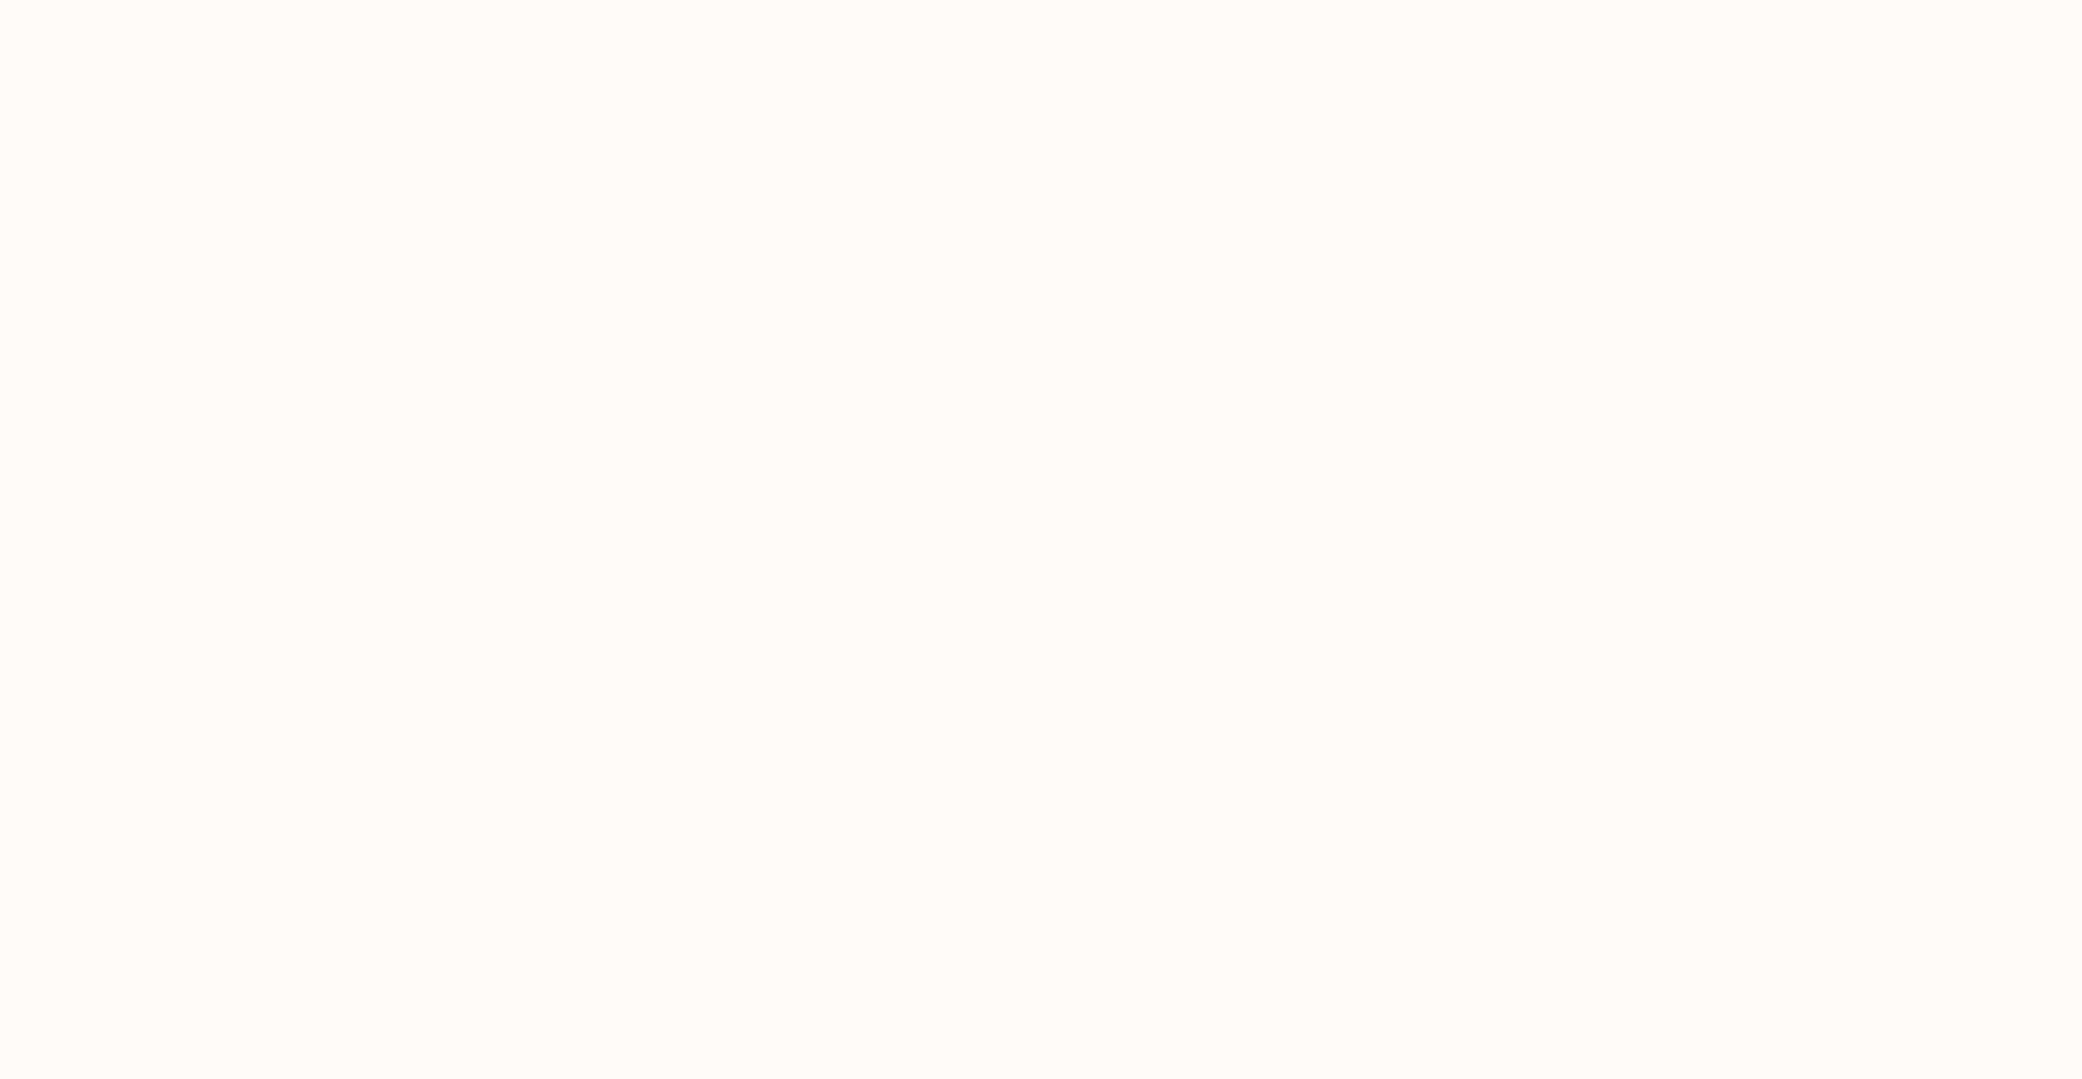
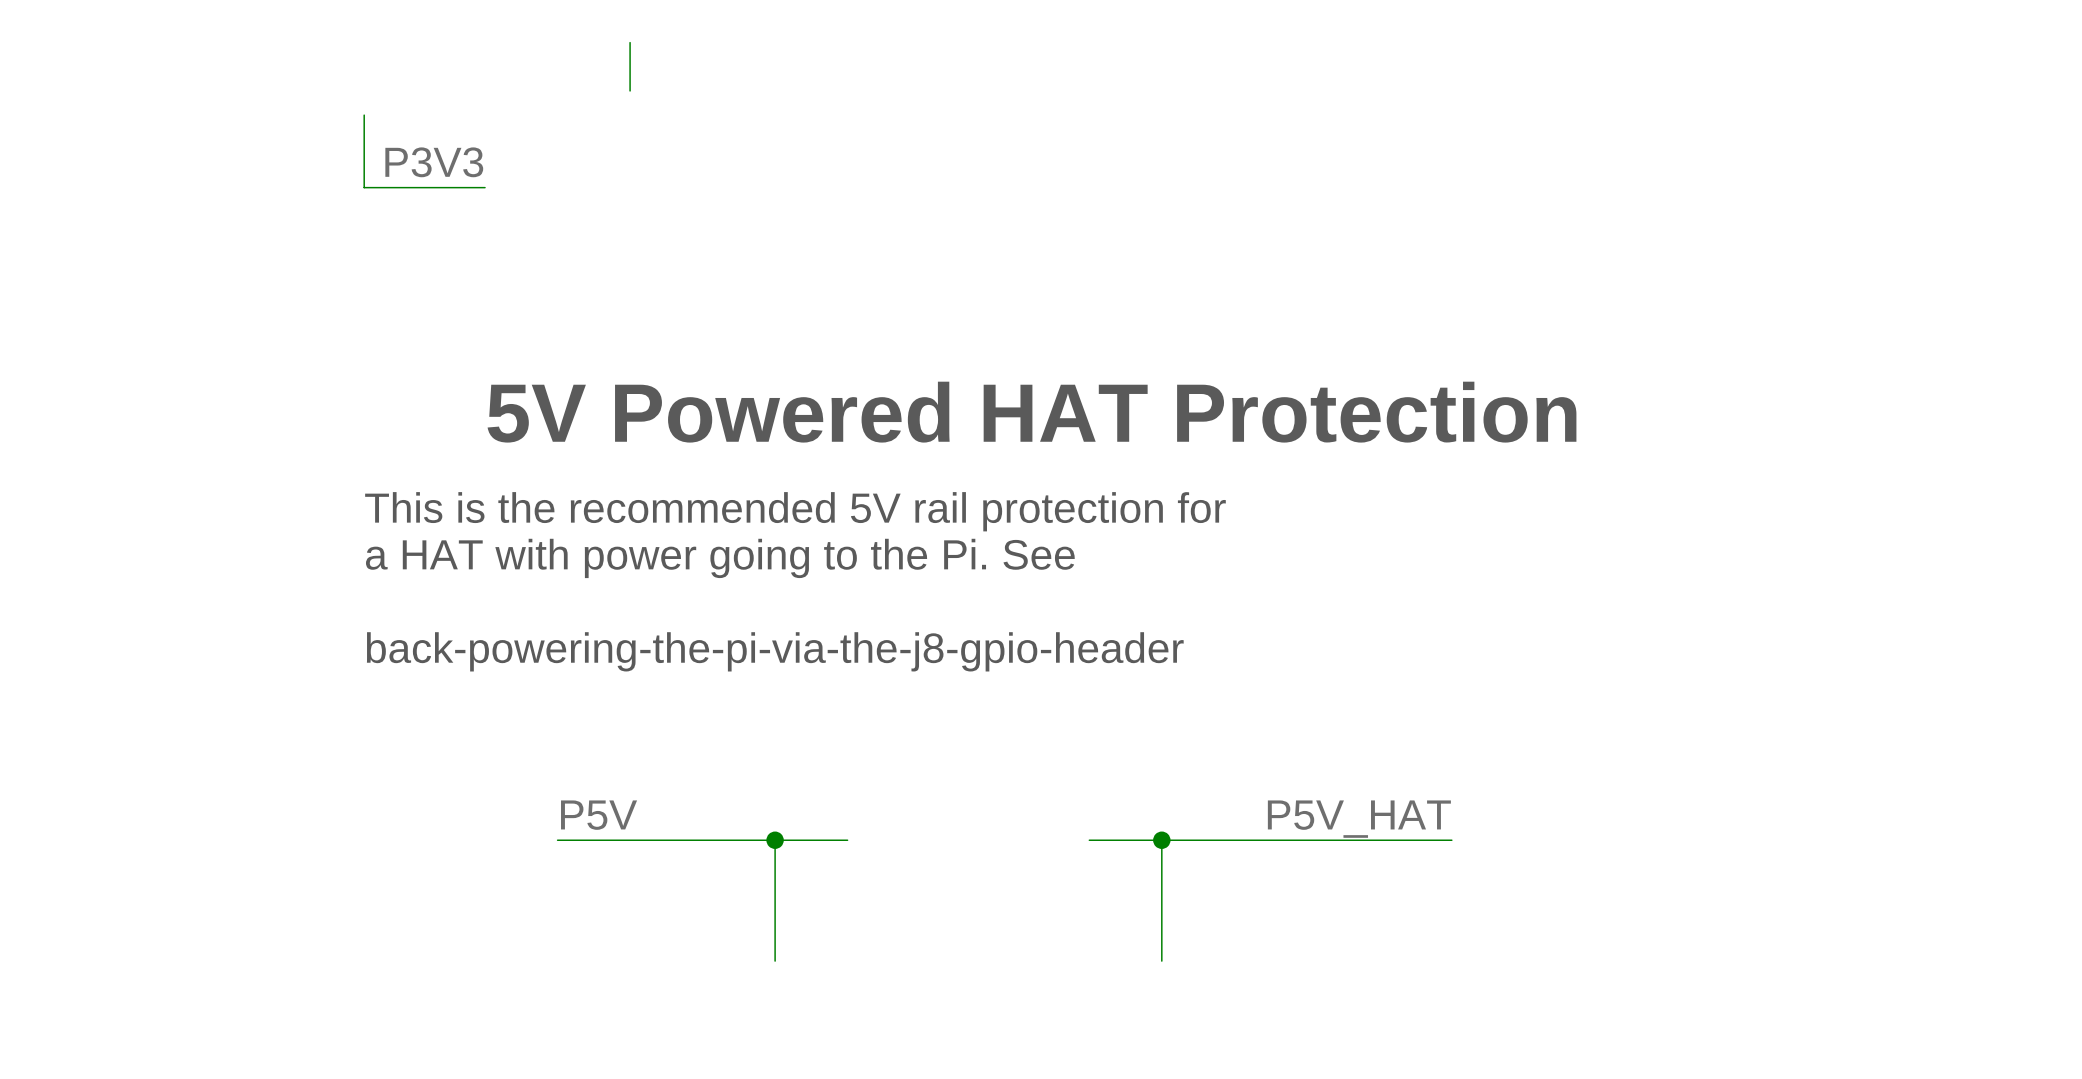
wire: none -> (630, 42) (630, 90)
wire: none -> (364, 115) (364, 187) (485, 187)
label: none -> P3V3 (434, 162)
text: none -> 5V Powered HAT Protection (1032, 412)
text: none -> This is the recommended 5V rail protection for (795, 511)
text: none -> a HAT with power going to the Pi. See (720, 558)
text: none -> back-powering-the-pi-via-the-j8-gpio-header (775, 651)
label: none -> P5V (599, 815)
label: none -> P5V_HAT (1359, 819)
wire: none -> (557, 840) (847, 840)
wire: none -> (775, 840) (775, 961)
junction: none -> (775, 840)
wire: none -> (1089, 840) (1451, 840)
wire: none -> (1161, 840) (1161, 961)
junction: none -> (1161, 840)

